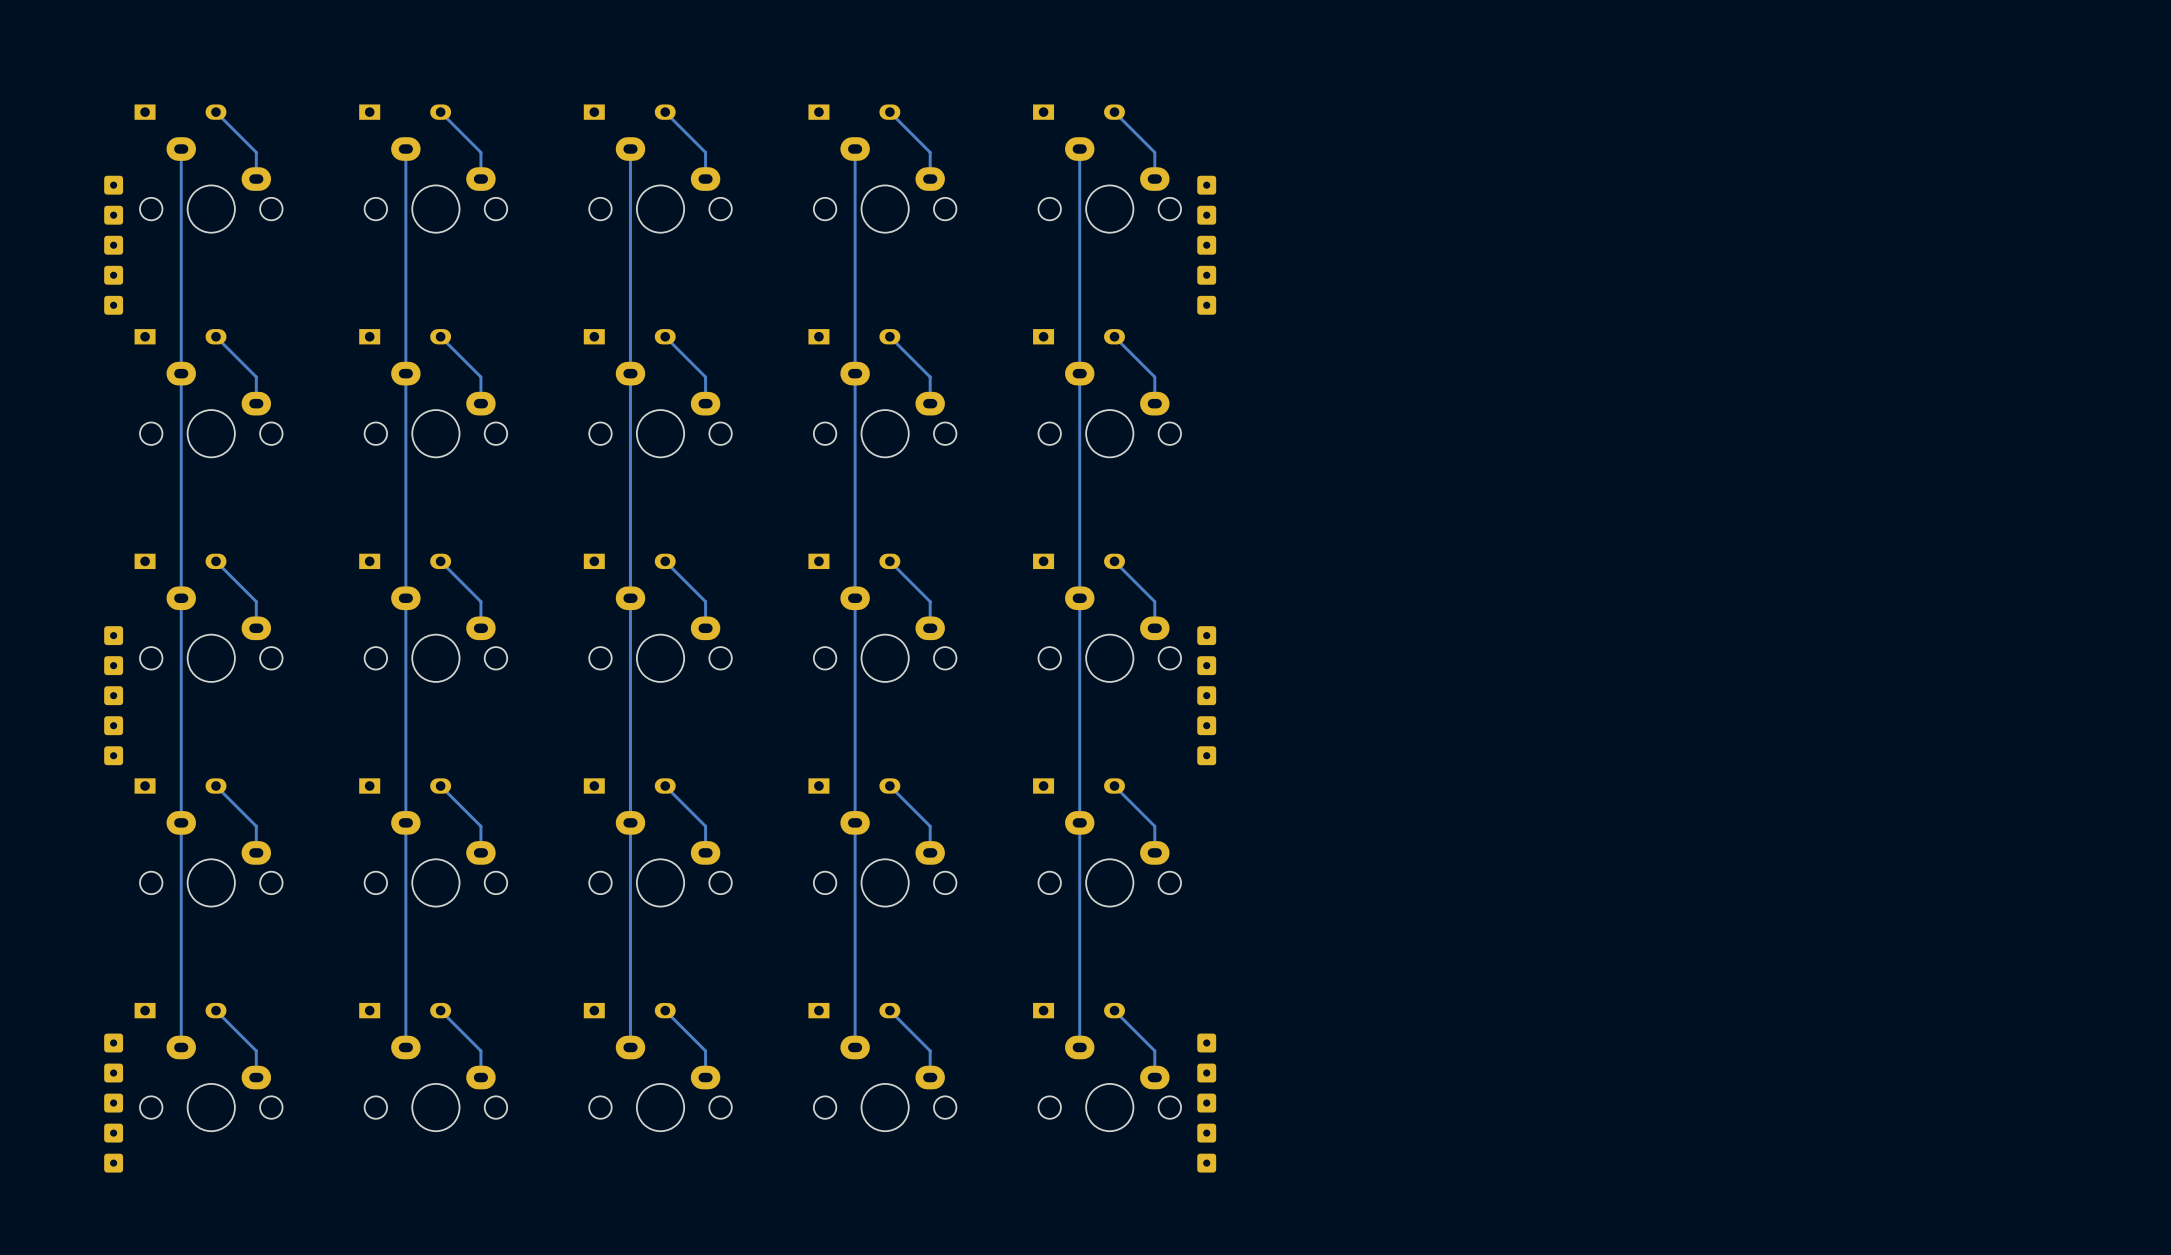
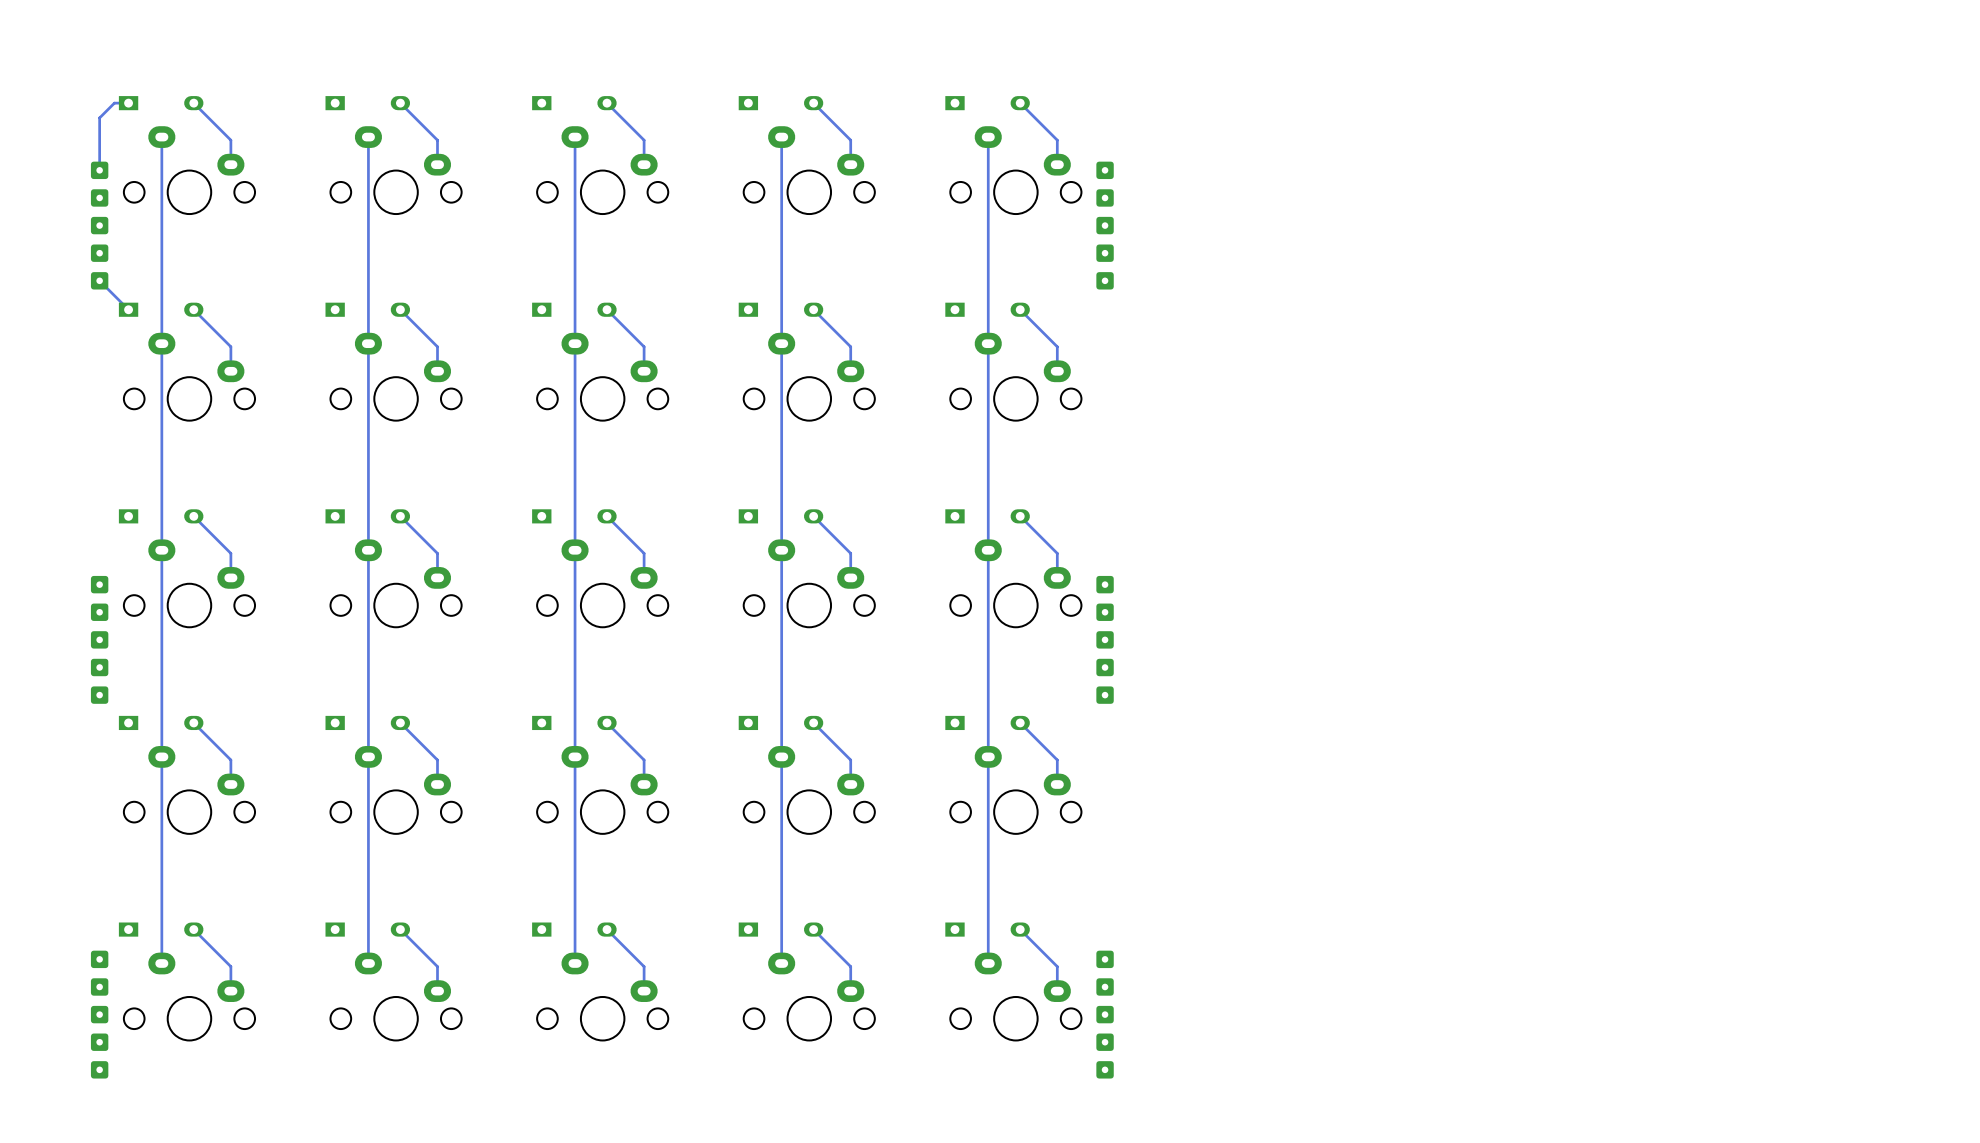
track: none -> (128, 103) (114, 103) (99, 117) (99, 170)
track: none -> (99, 280) (128, 309)

